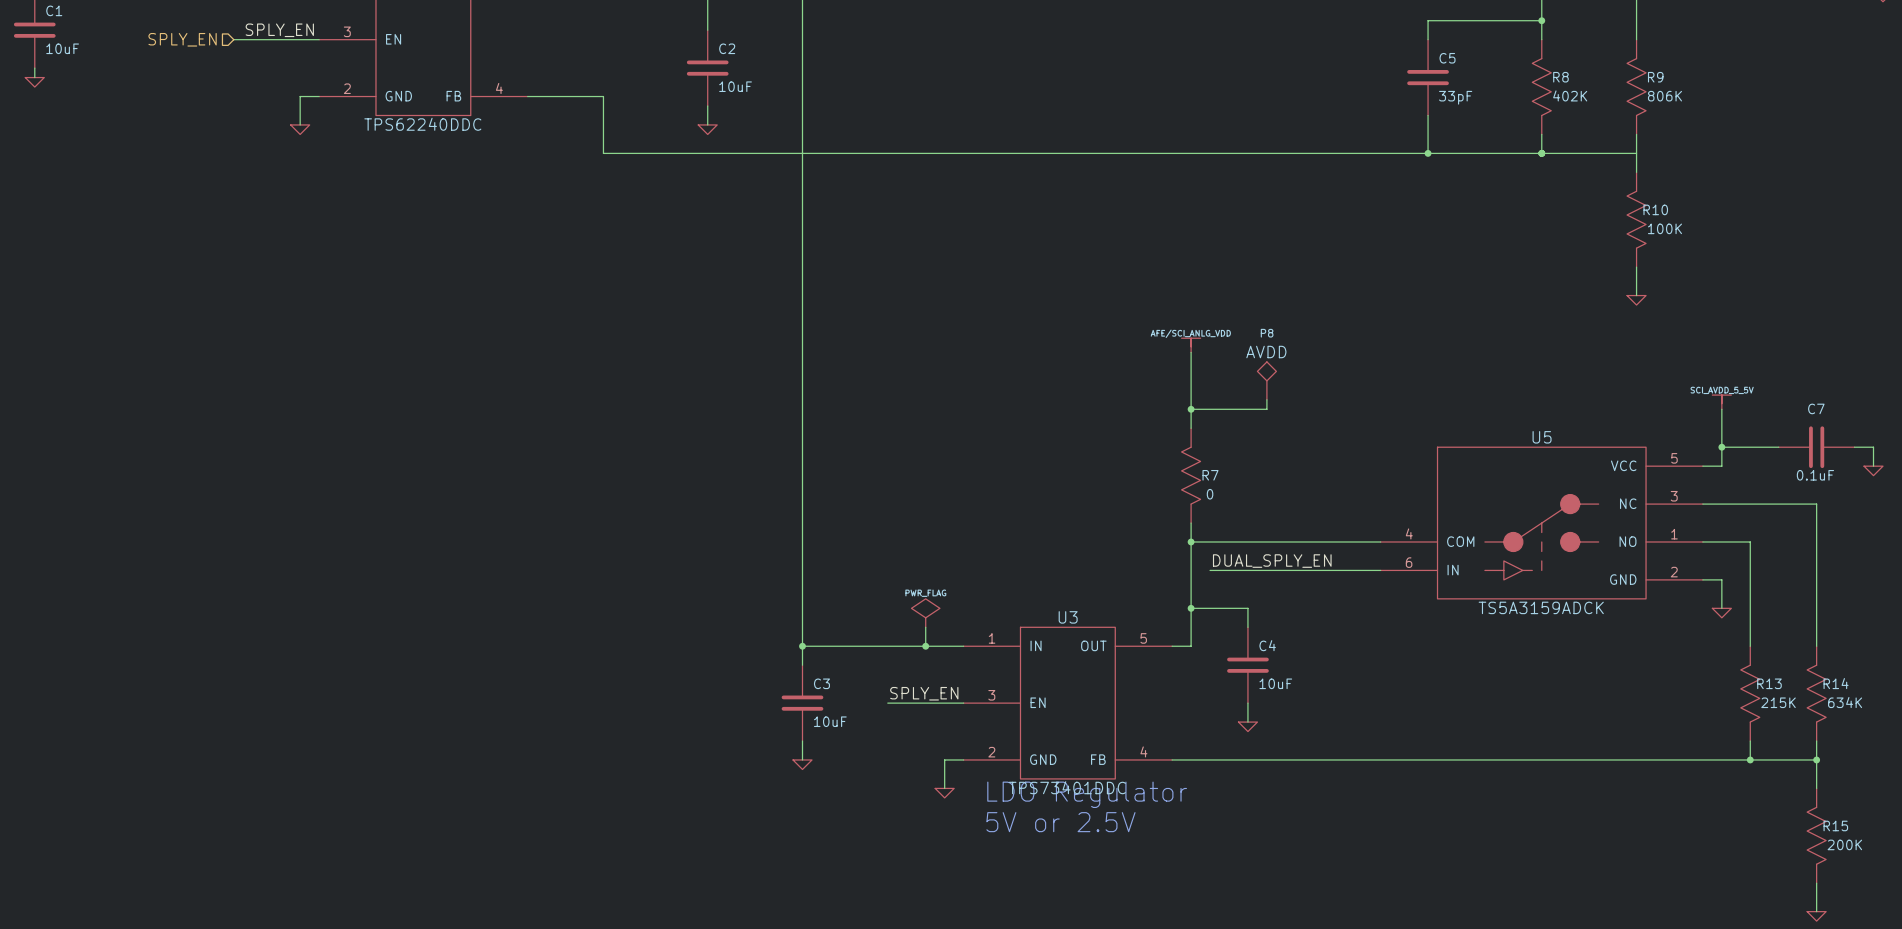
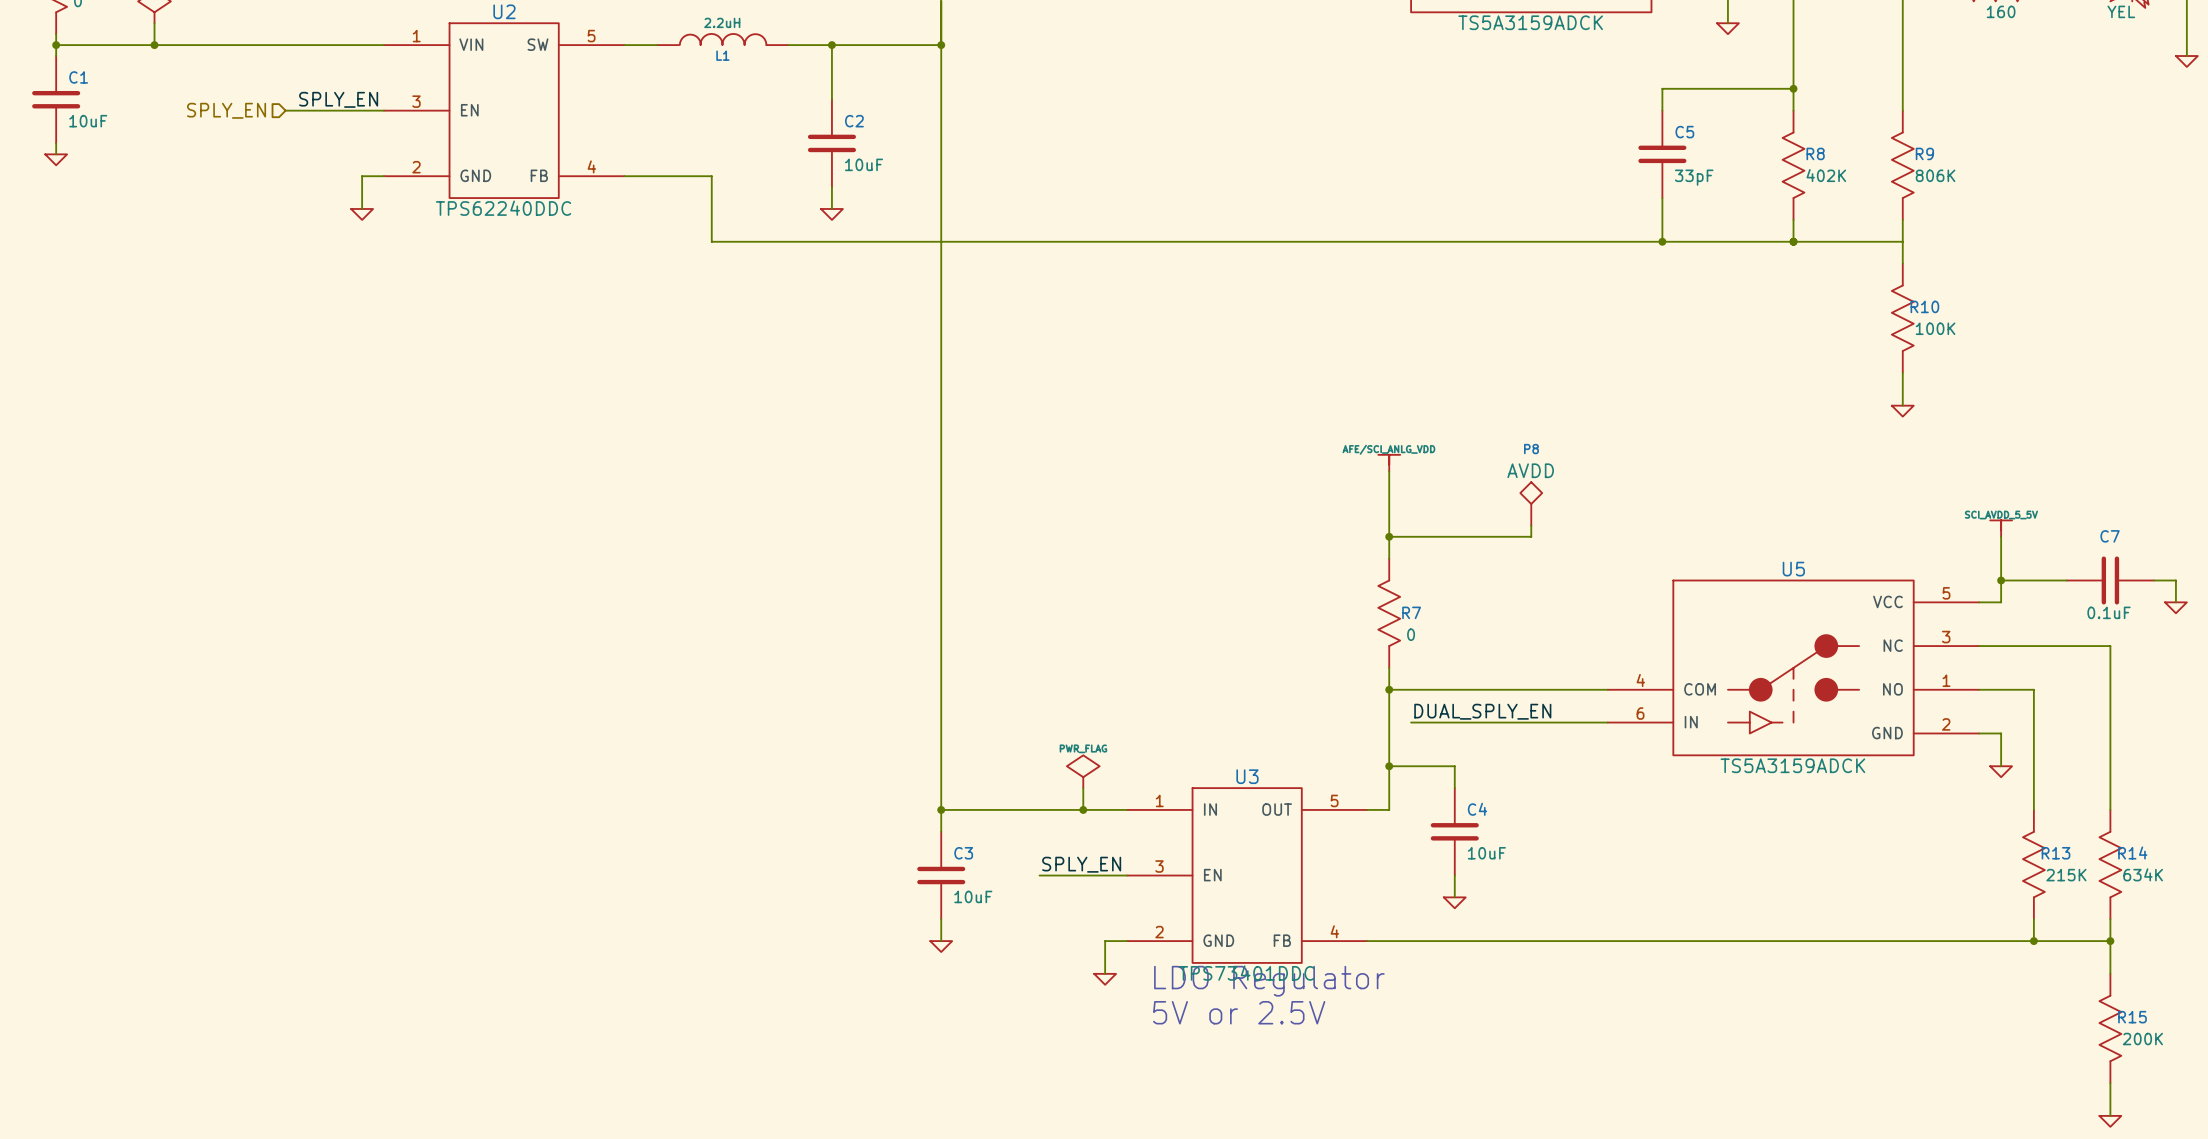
P8 position: (1266, 380) -> (1531, 504)
wire: (1266, 399) (1266, 409) -> (1531, 525) (1531, 536) (1476, 536)

